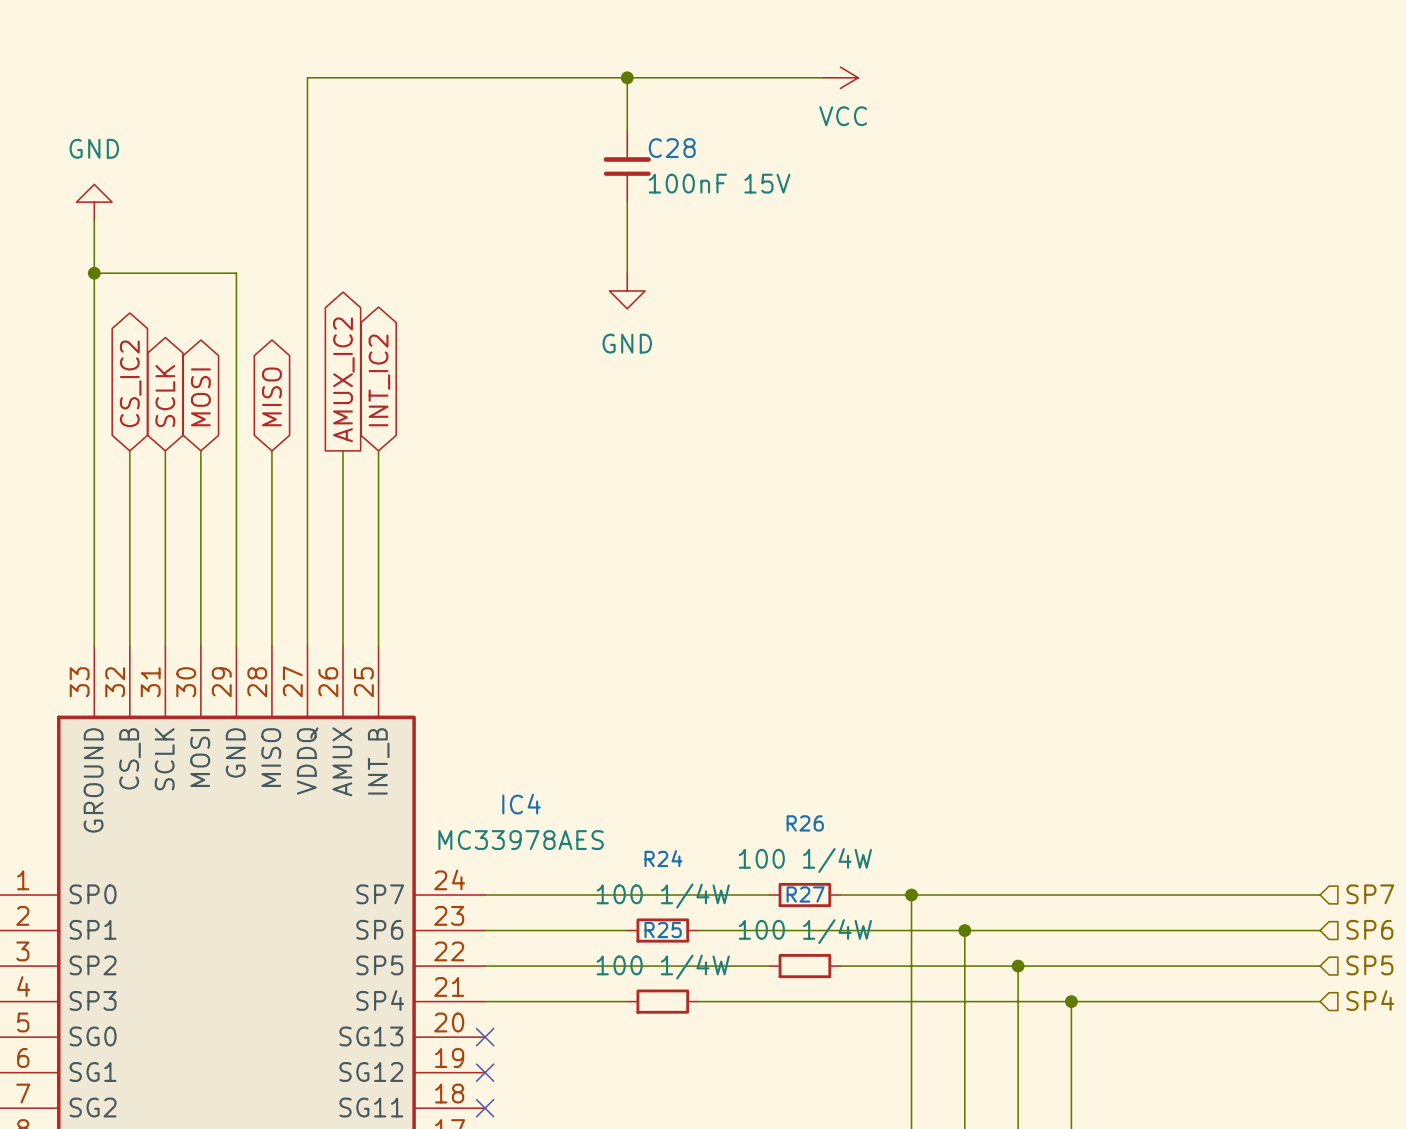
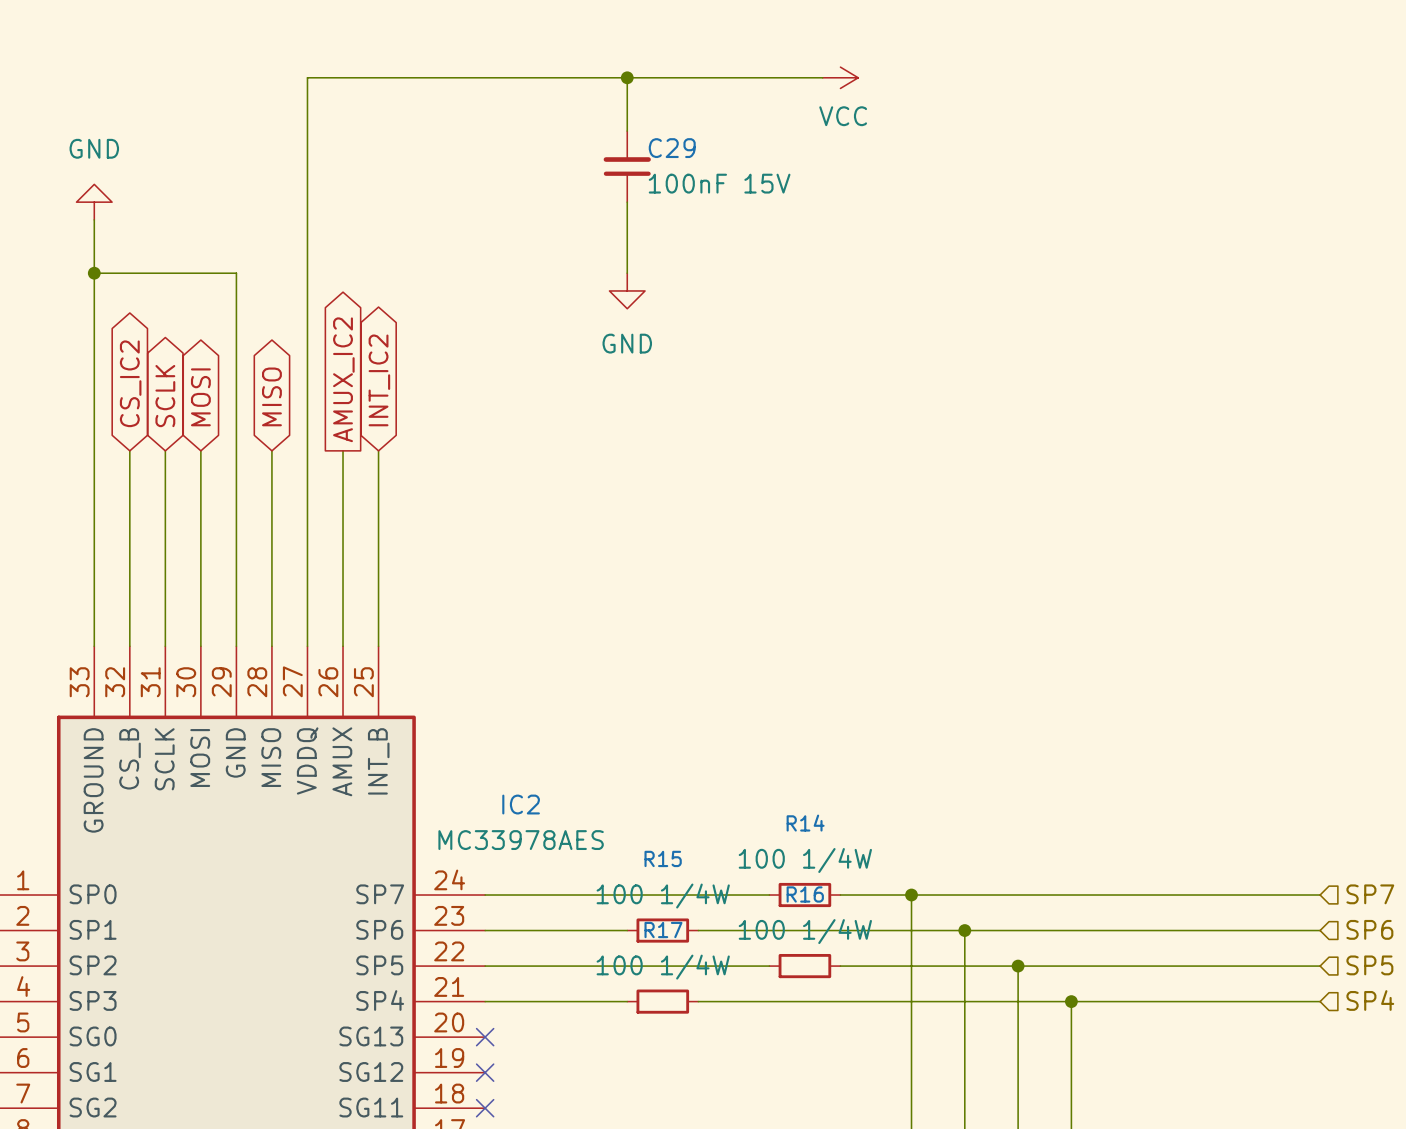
C28 name: C28 (672, 148) -> C29 (672, 148)
IC4 name: IC4 (521, 804) -> IC2 (521, 804)
R26 name: R26 (805, 823) -> R14 (805, 823)
R24 name: R24 (663, 858) -> R15 (663, 858)
R27 name: R27 (805, 894) -> R16 (805, 894)
R25 name: R25 (663, 930) -> R17 (663, 930)

